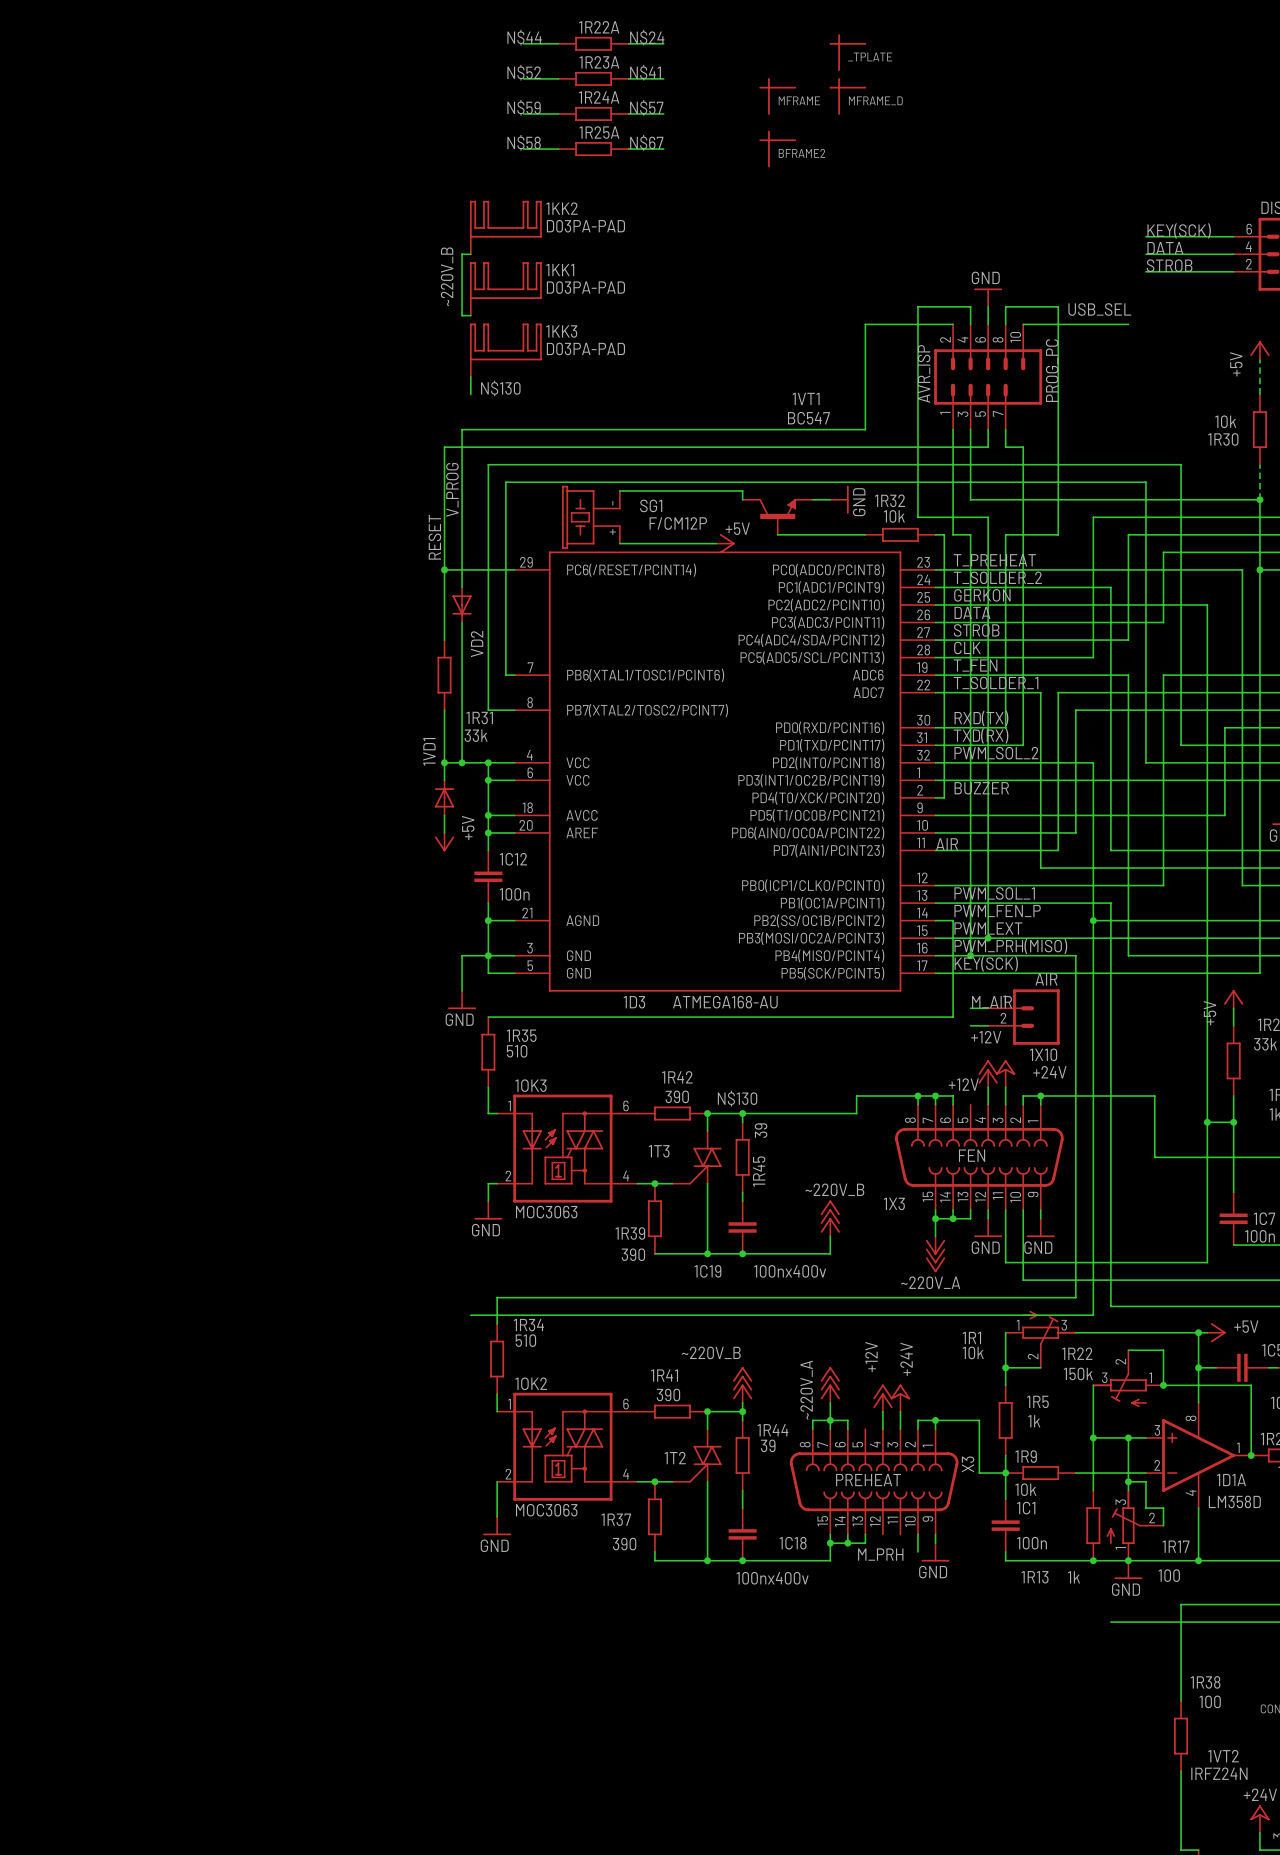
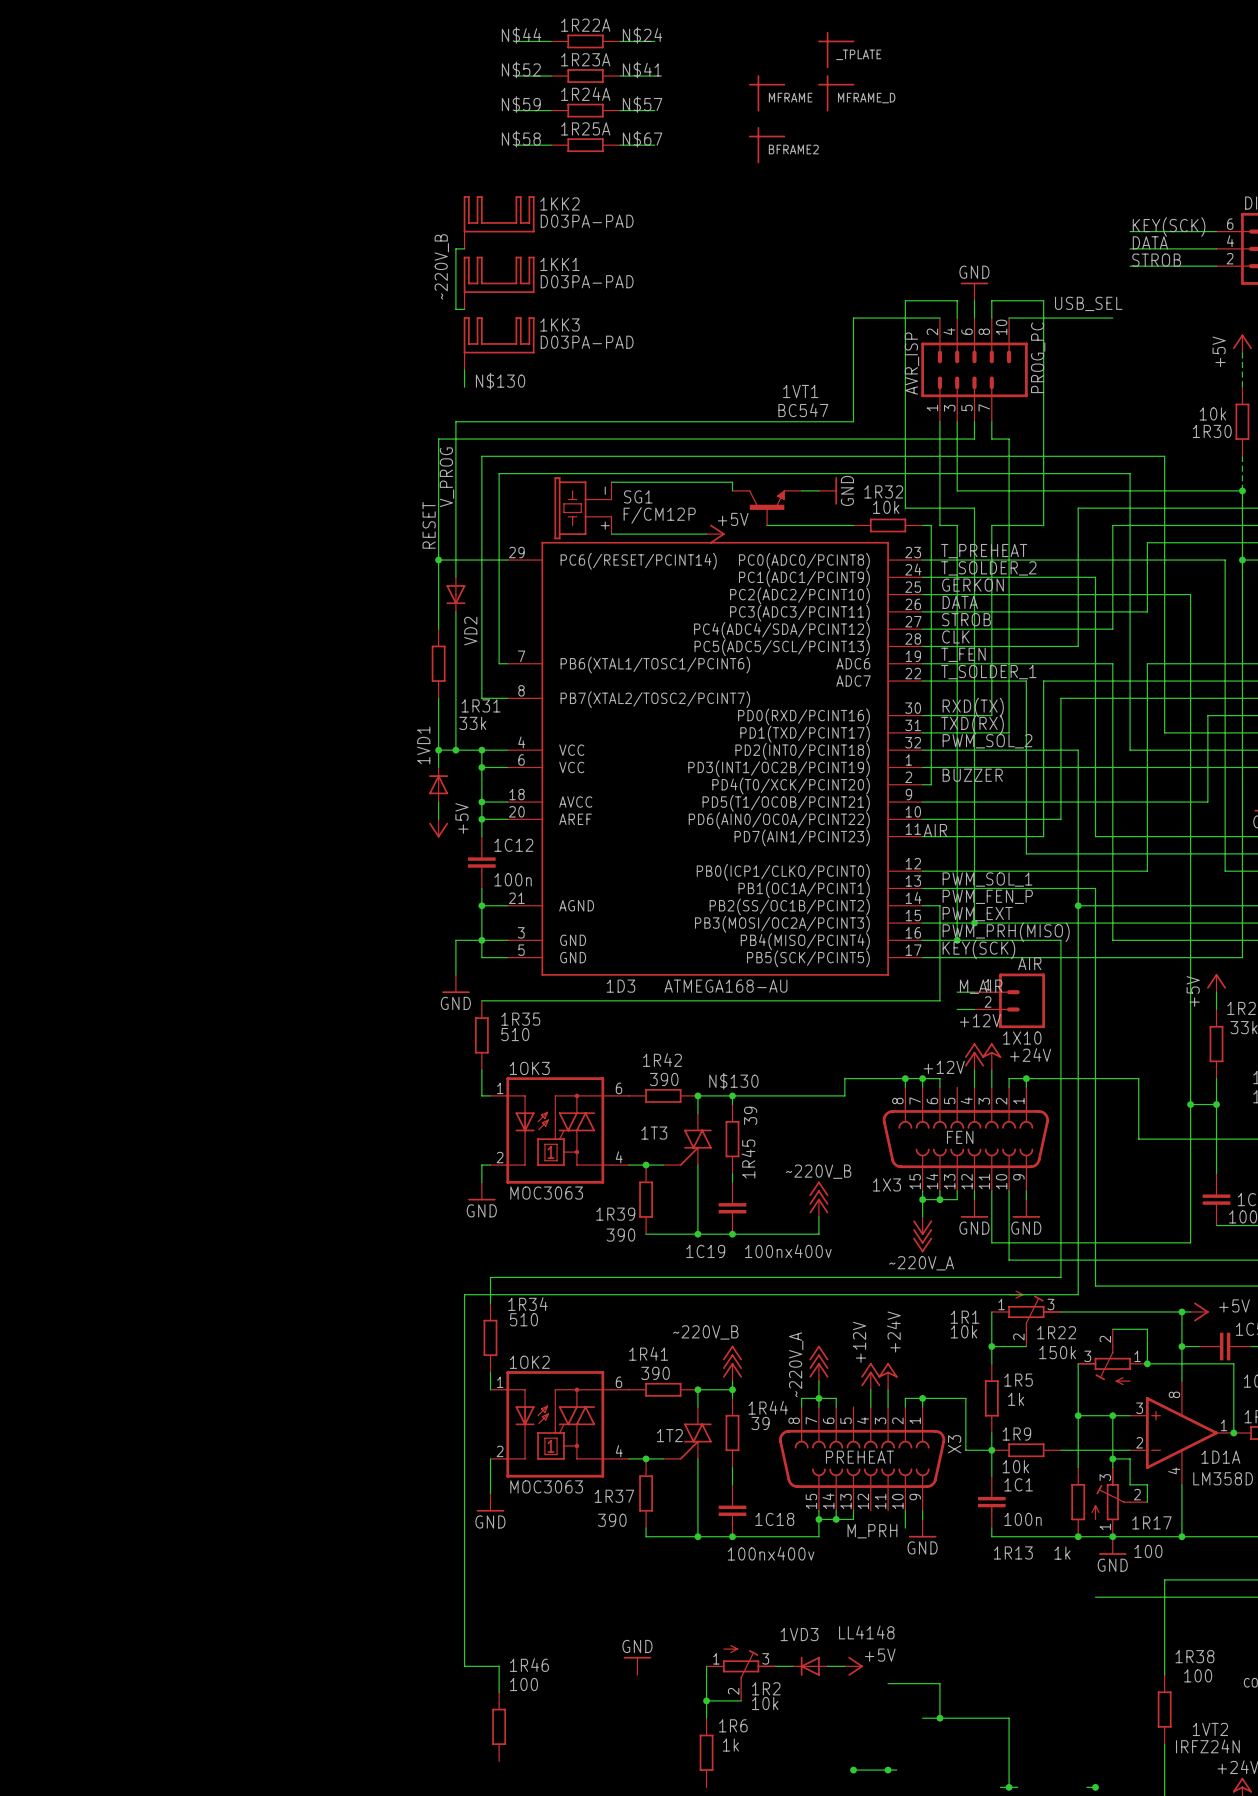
wire: none -> (464, 1294) (464, 1666) (499, 1666) (499, 1692)
power symbol: none -> GND (637, 1665)
wire: none -> (706, 1666) (706, 1718)
wire: none -> (775, 1666) (793, 1666)
1VD3: none -> LL4148 (810, 1666)
wire: none -> (827, 1666) (844, 1666)
power symbol: none -> +5V (853, 1666)
1R2: none -> 10k (741, 1673)
wire: none -> (888, 1683) (939, 1683) (939, 1718)
wire: none -> (706, 1700) (741, 1700)
junction: none -> (706, 1700)
wire: none -> (922, 1718) (1009, 1718) (1009, 1787)
junction: none -> (939, 1718)
1R46: none -> 100 (499, 1726)
1R6: none -> 1k (706, 1752)
wire: none -> (853, 1770) (896, 1770)
junction: none -> (853, 1770)
junction: none -> (888, 1770)
wire: none -> (1000, 1787) (1017, 1787)
junction: none -> (1009, 1787)
wire: none -> (1086, 1787) (1095, 1787)
junction: none -> (1095, 1787)

